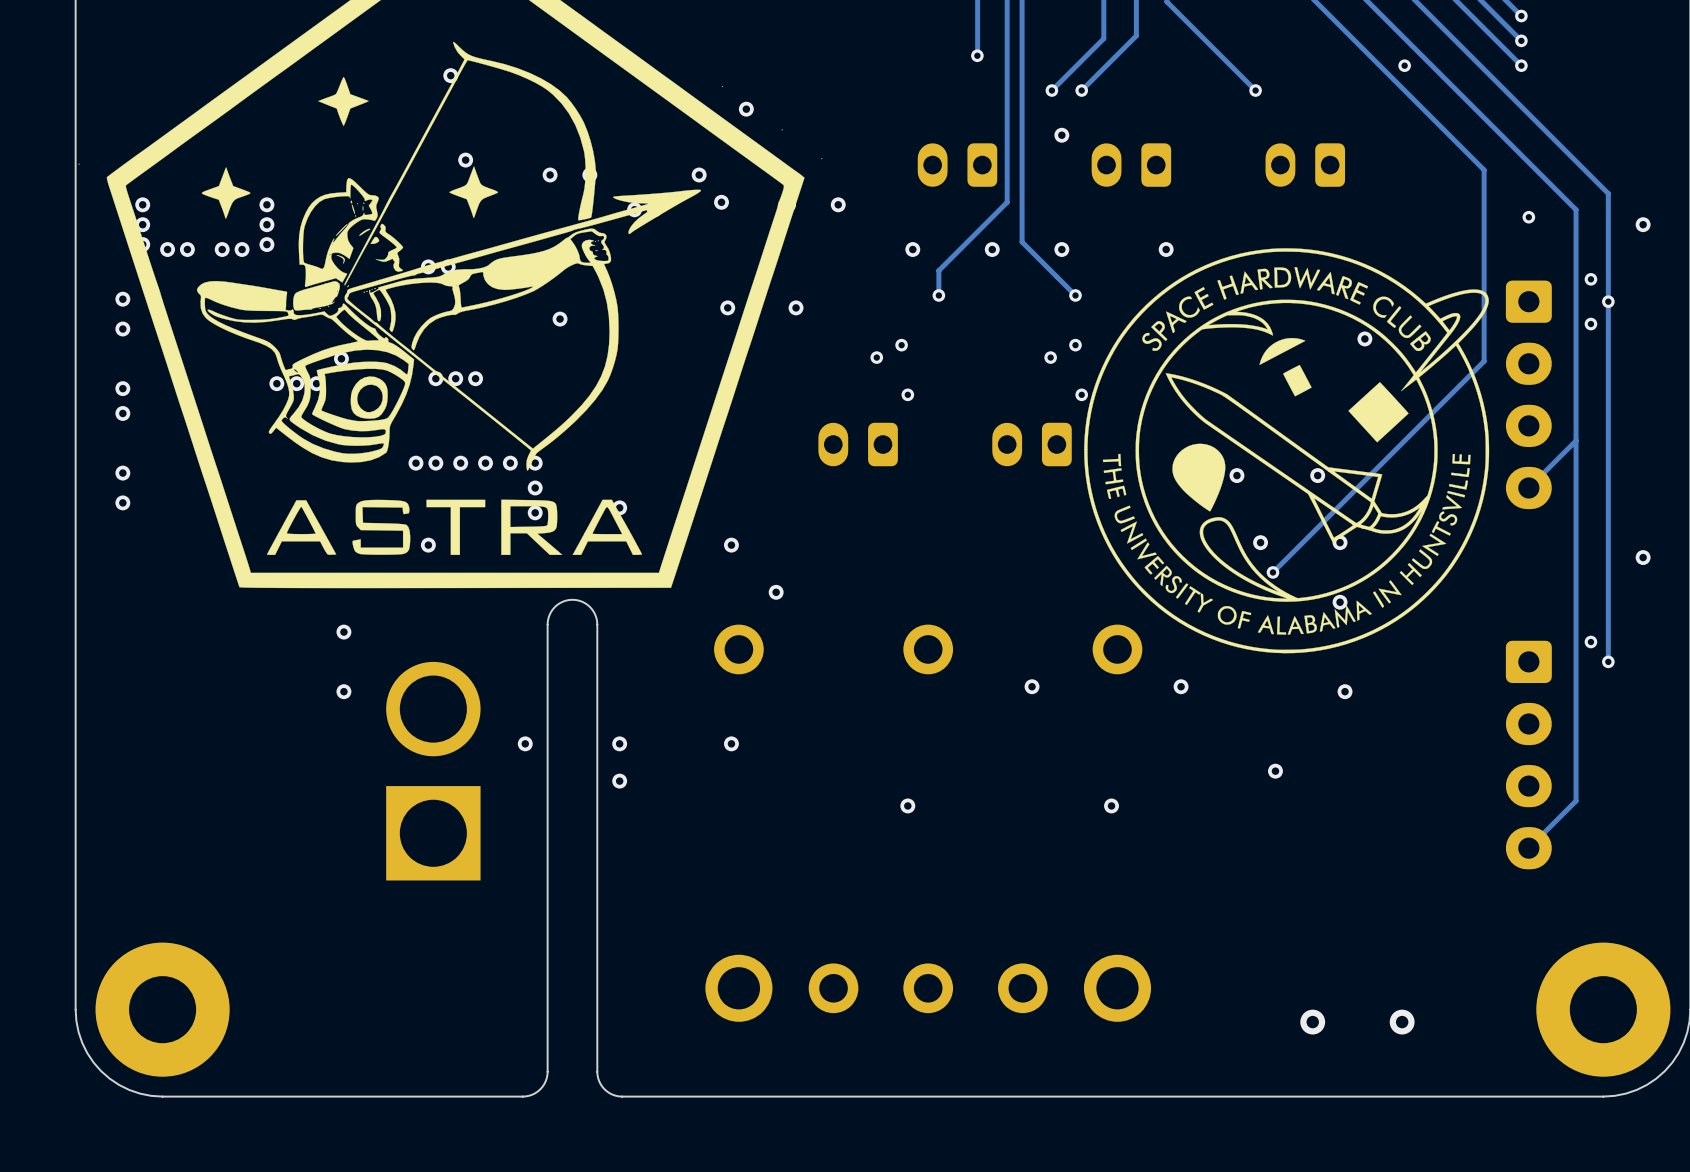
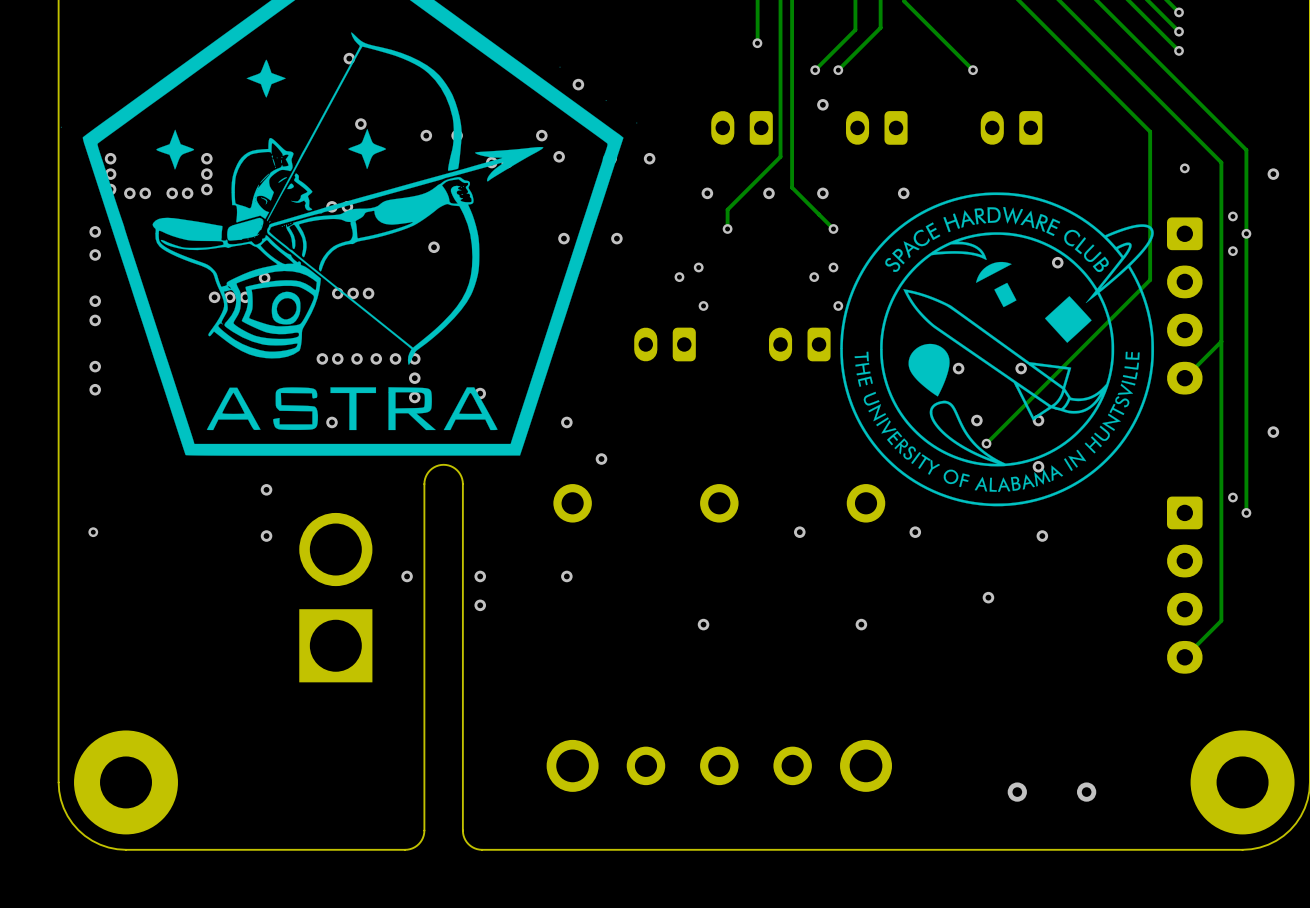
via: (1404, 65) -> none
via: none -> (93, 532)

